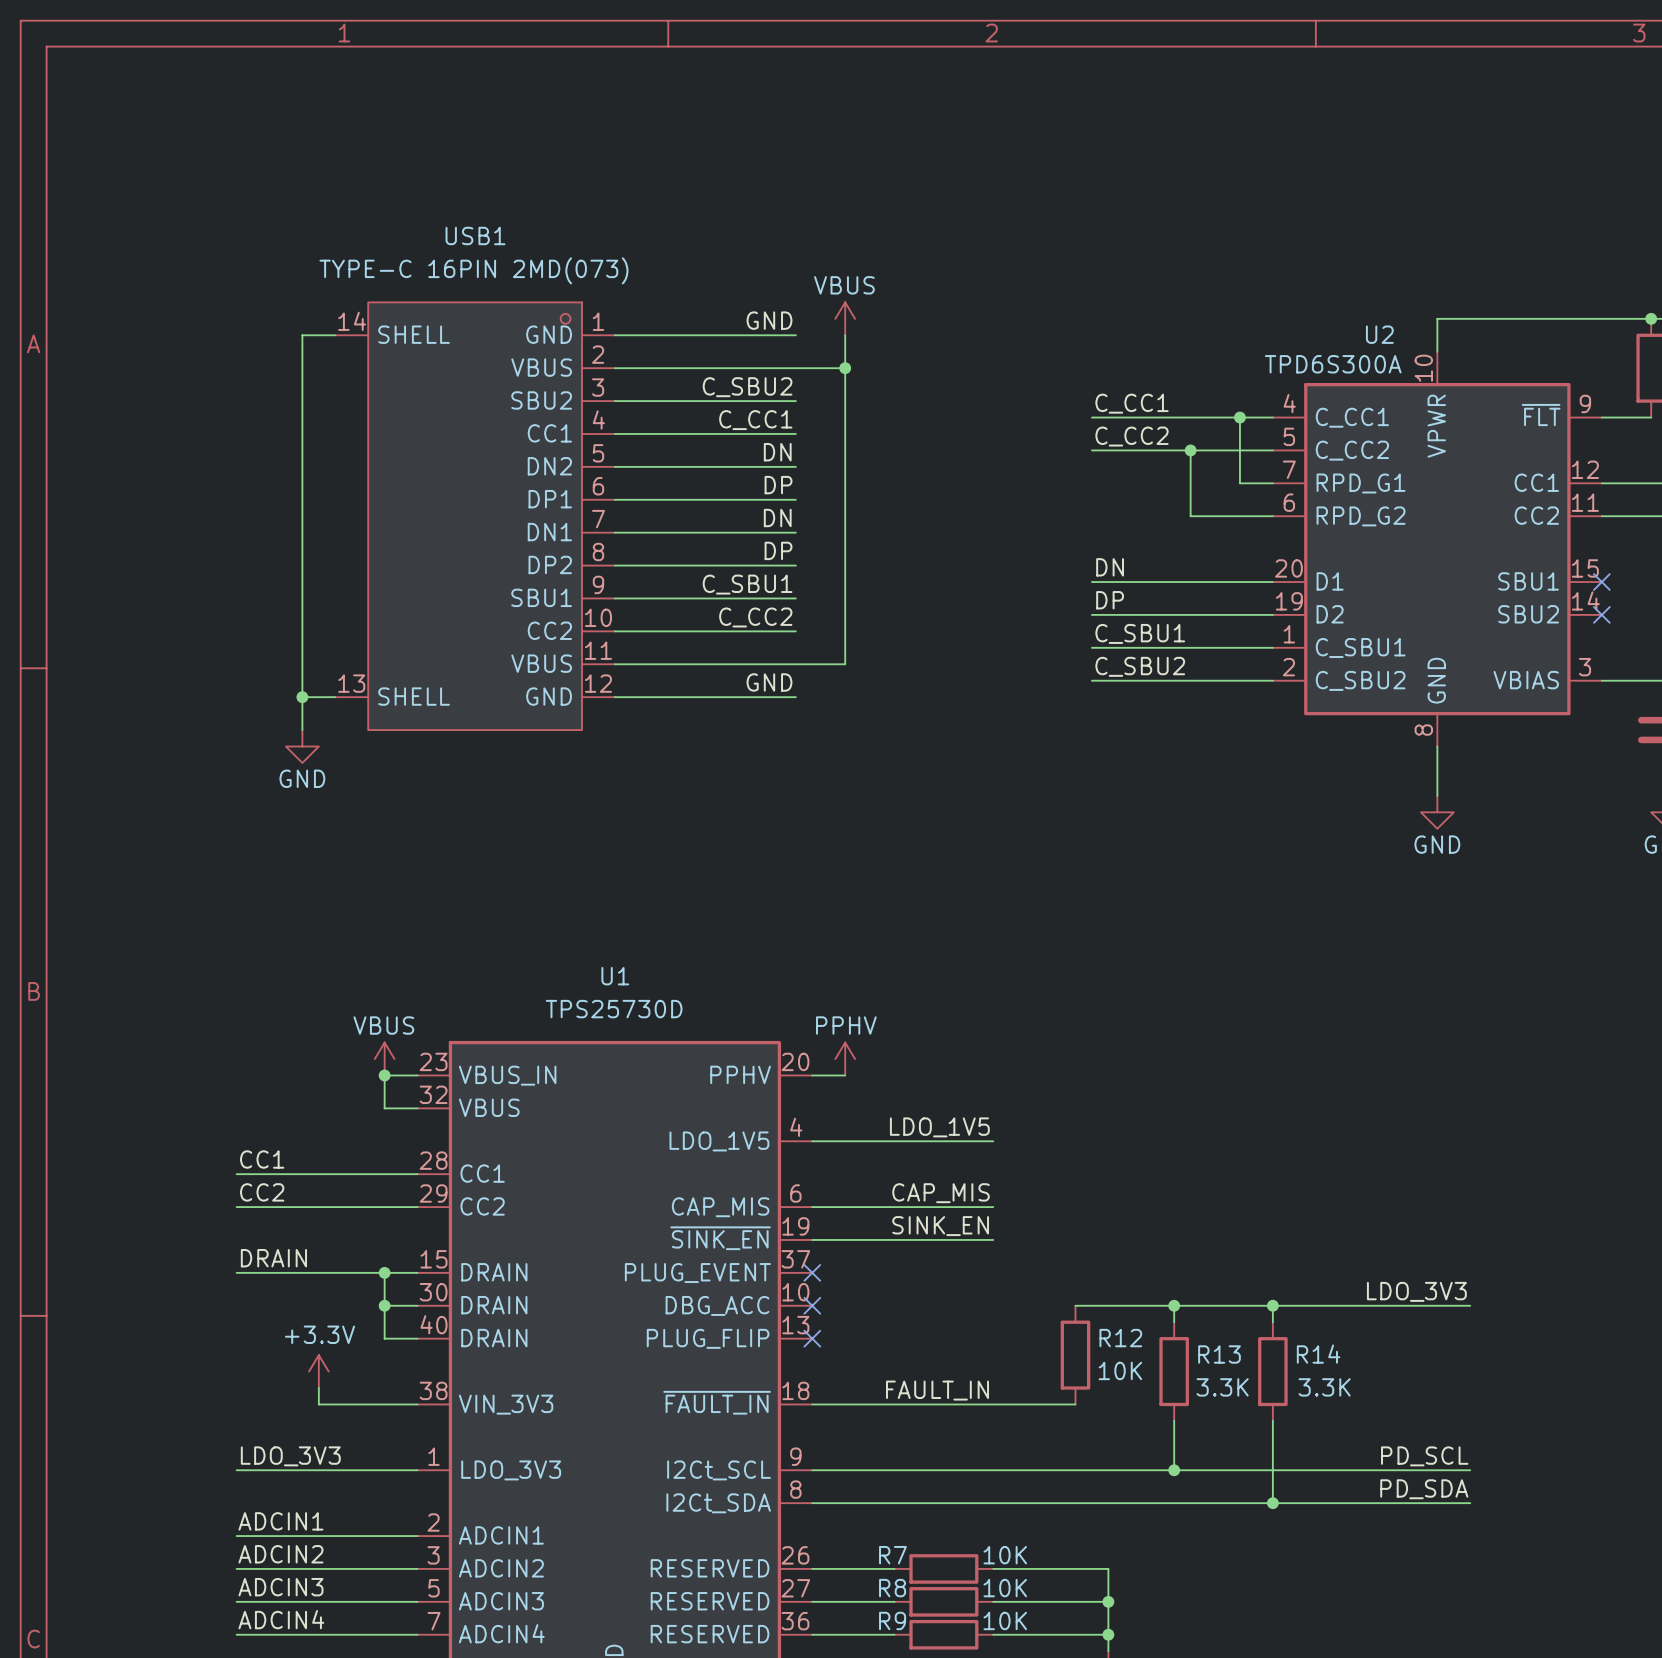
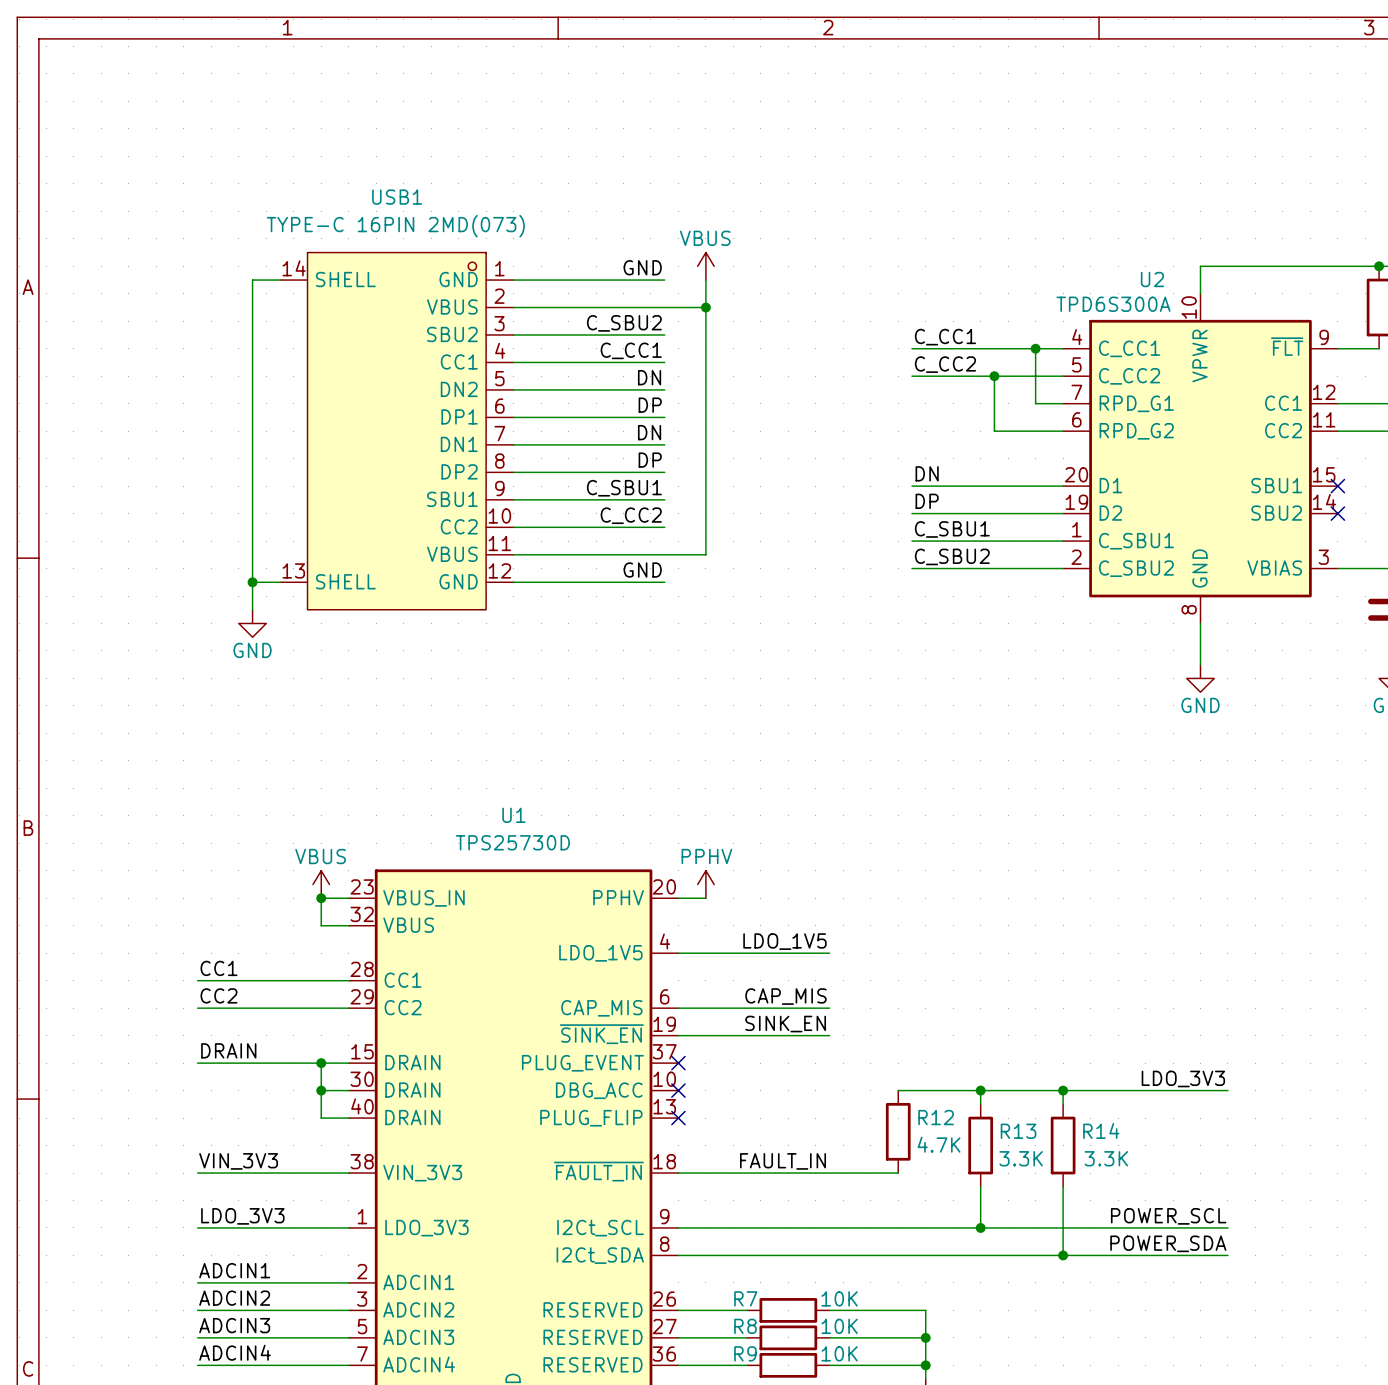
R12 value: 10K (1120, 1370) -> 4.7K (939, 1144)
power symbol: +3.3V (318, 1371) -> none
wire: (318, 1388) (318, 1404) -> (197, 1173) (266, 1173)
label: none -> VIN_3V3 (238, 1161)
label: PD_SCL (1424, 1456) -> POWER_SCL (1168, 1216)
label: PD_SDA (1424, 1489) -> POWER_SDA (1168, 1243)

